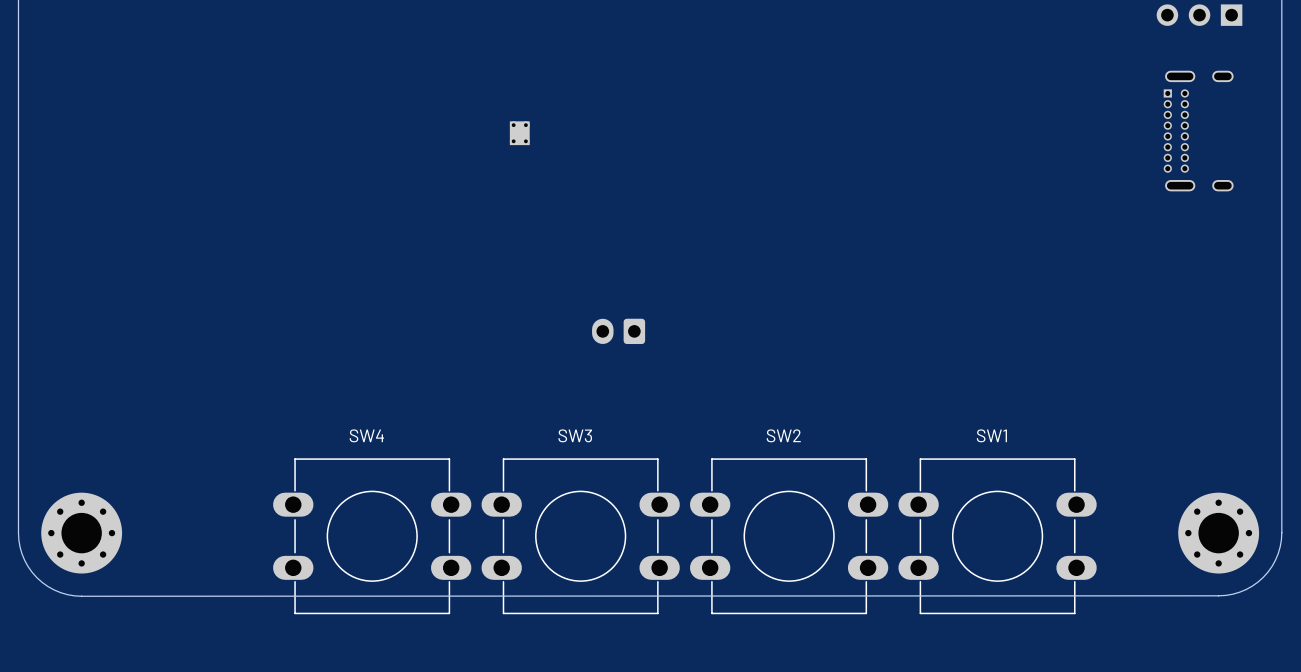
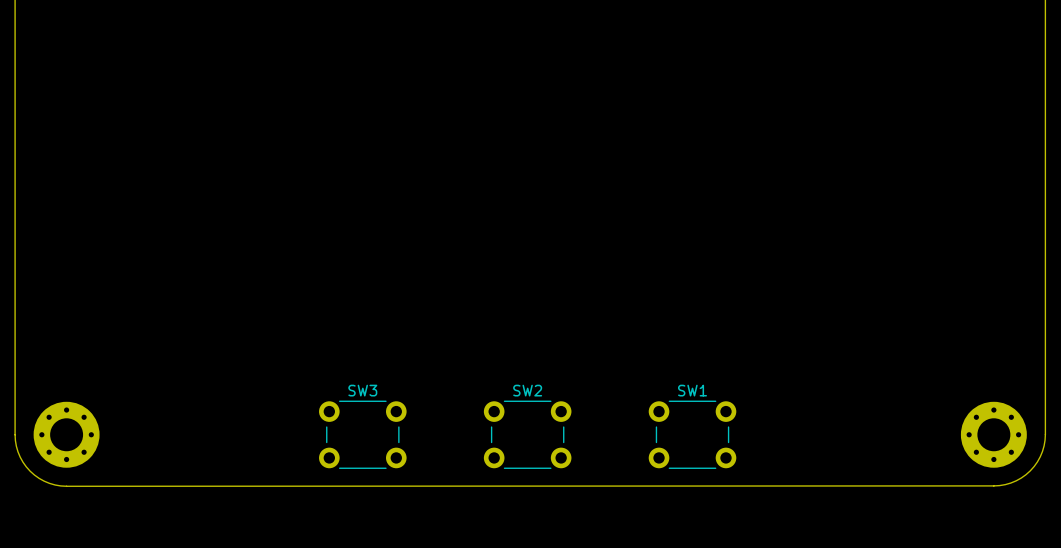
part: (1199, 15) -> none
part: (1198, 131) -> none
part: (519, 133) -> none
part: (618, 331) -> none
SW3 name position: SW3 (575, 435) -> SW3 (362, 390)
SW2 name position: SW2 (783, 435) -> SW2 (527, 390)
SW1 name position: SW1 (991, 435) -> SW1 (692, 390)
SW3 footprint: [481, 458, 680, 615] -> [319, 400, 407, 469]
SW2 footprint: [689, 458, 889, 615] -> [483, 400, 572, 469]
SW1 footprint: [898, 458, 1097, 615] -> [648, 400, 737, 469]
SW4: (372, 536) -> none

